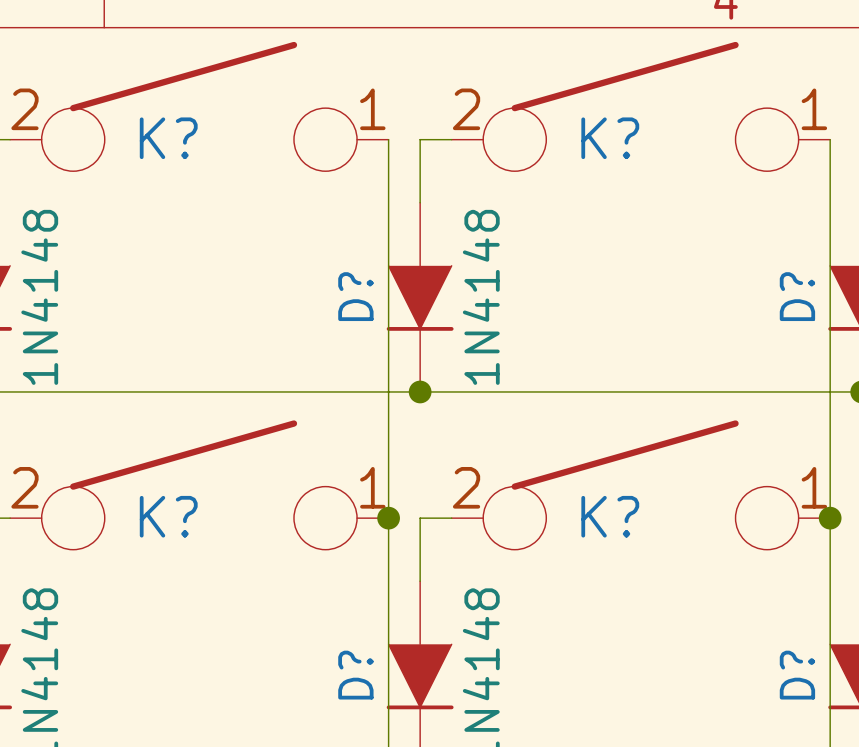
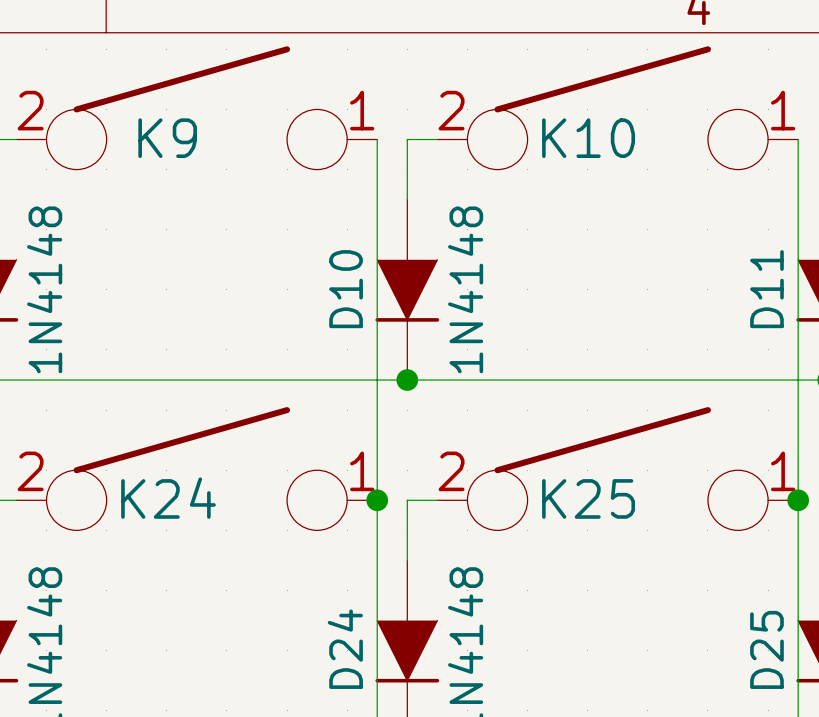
K? name: K? (168, 138) -> K9 (167, 138)
K? name: K? (610, 138) -> K10 (588, 138)
D? name: D? (355, 296) -> D10 (346, 289)
D? name: D? (797, 296) -> D11 (766, 289)
K? name: K? (168, 516) -> K24 (168, 498)
K? name: K? (610, 516) -> K25 (588, 498)
D? name: D? (355, 675) -> D24 (345, 649)
D? name: D? (797, 675) -> D25 (766, 649)

